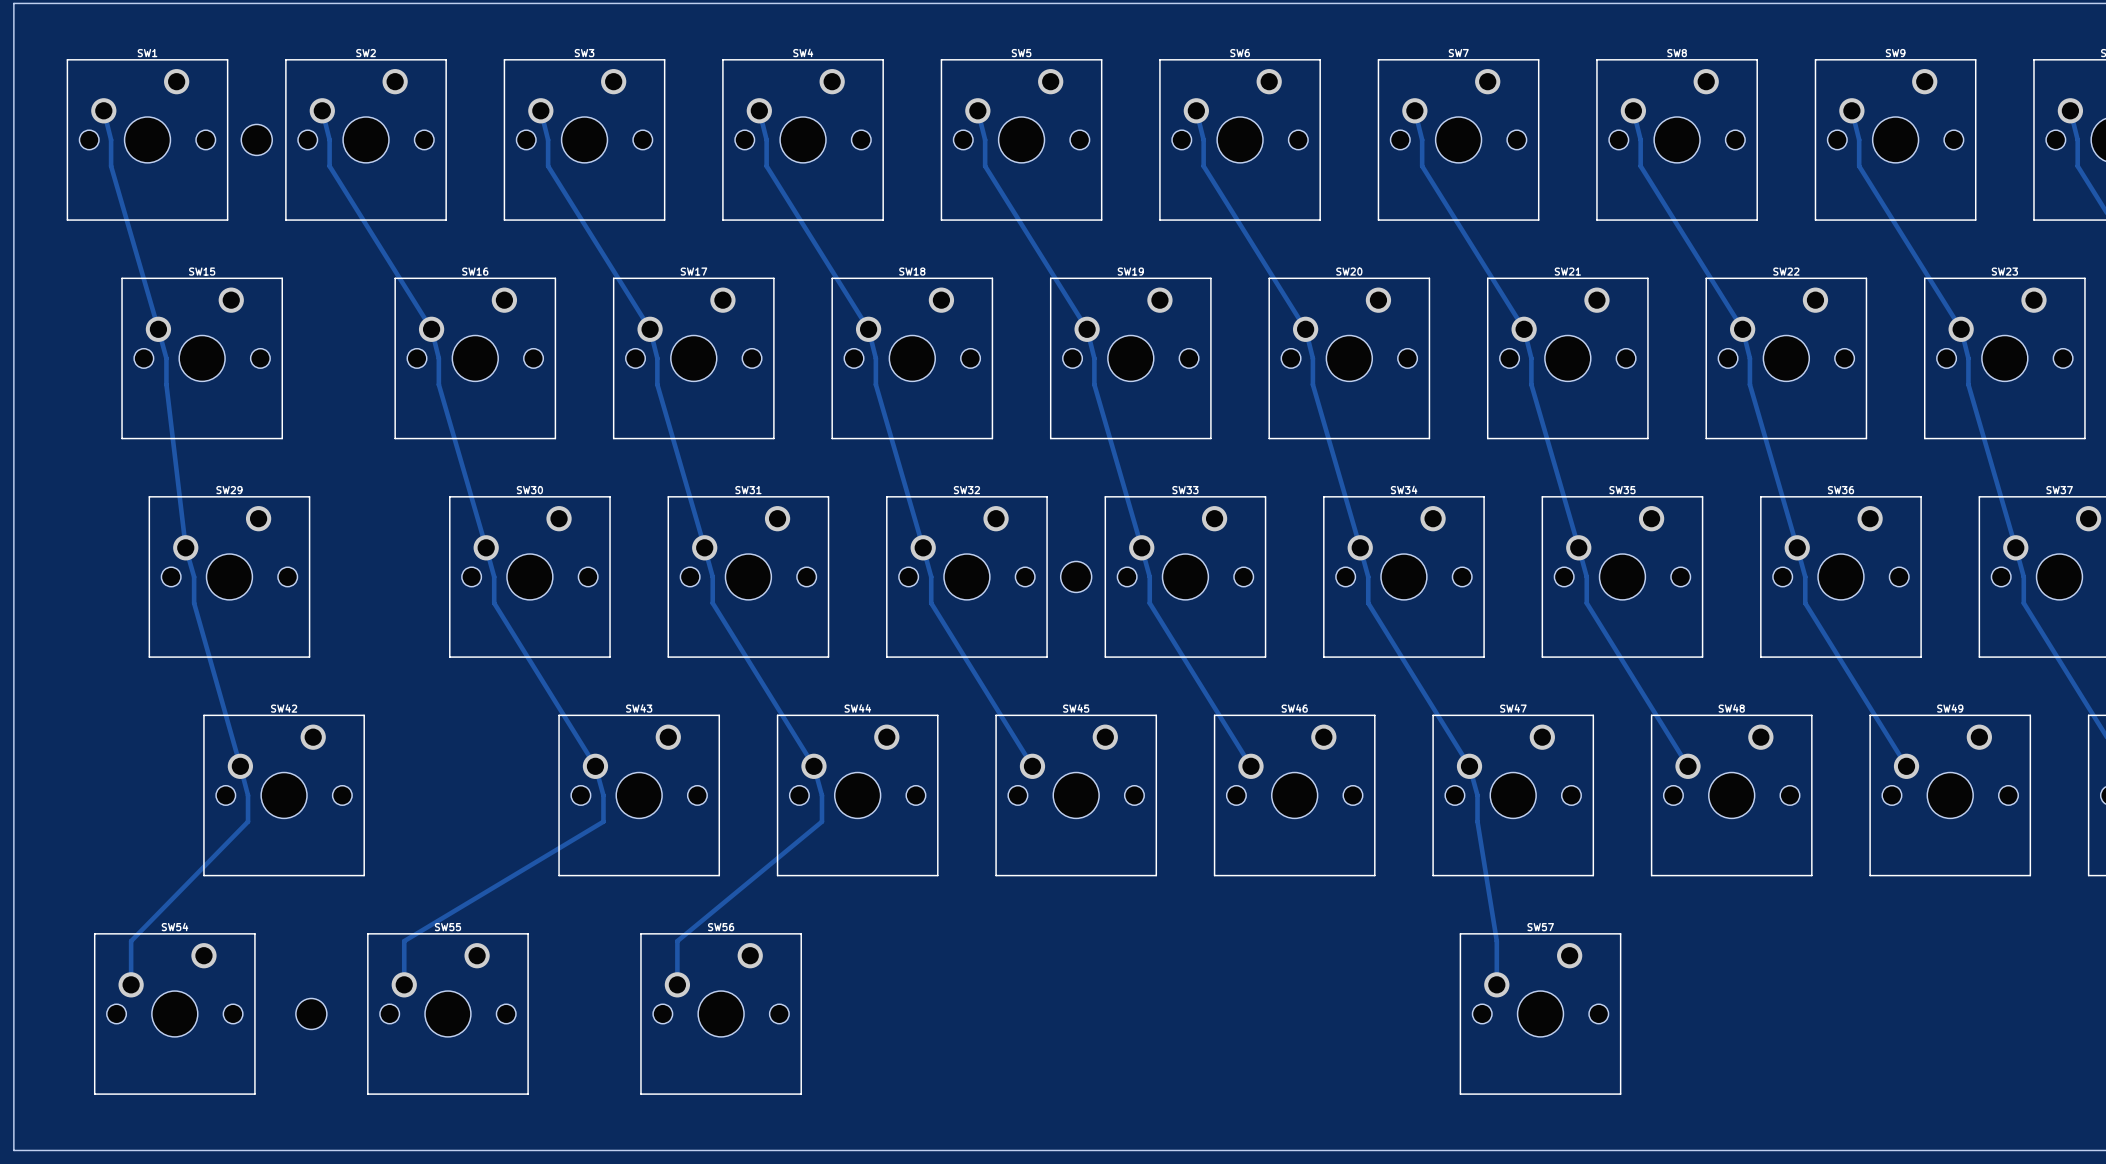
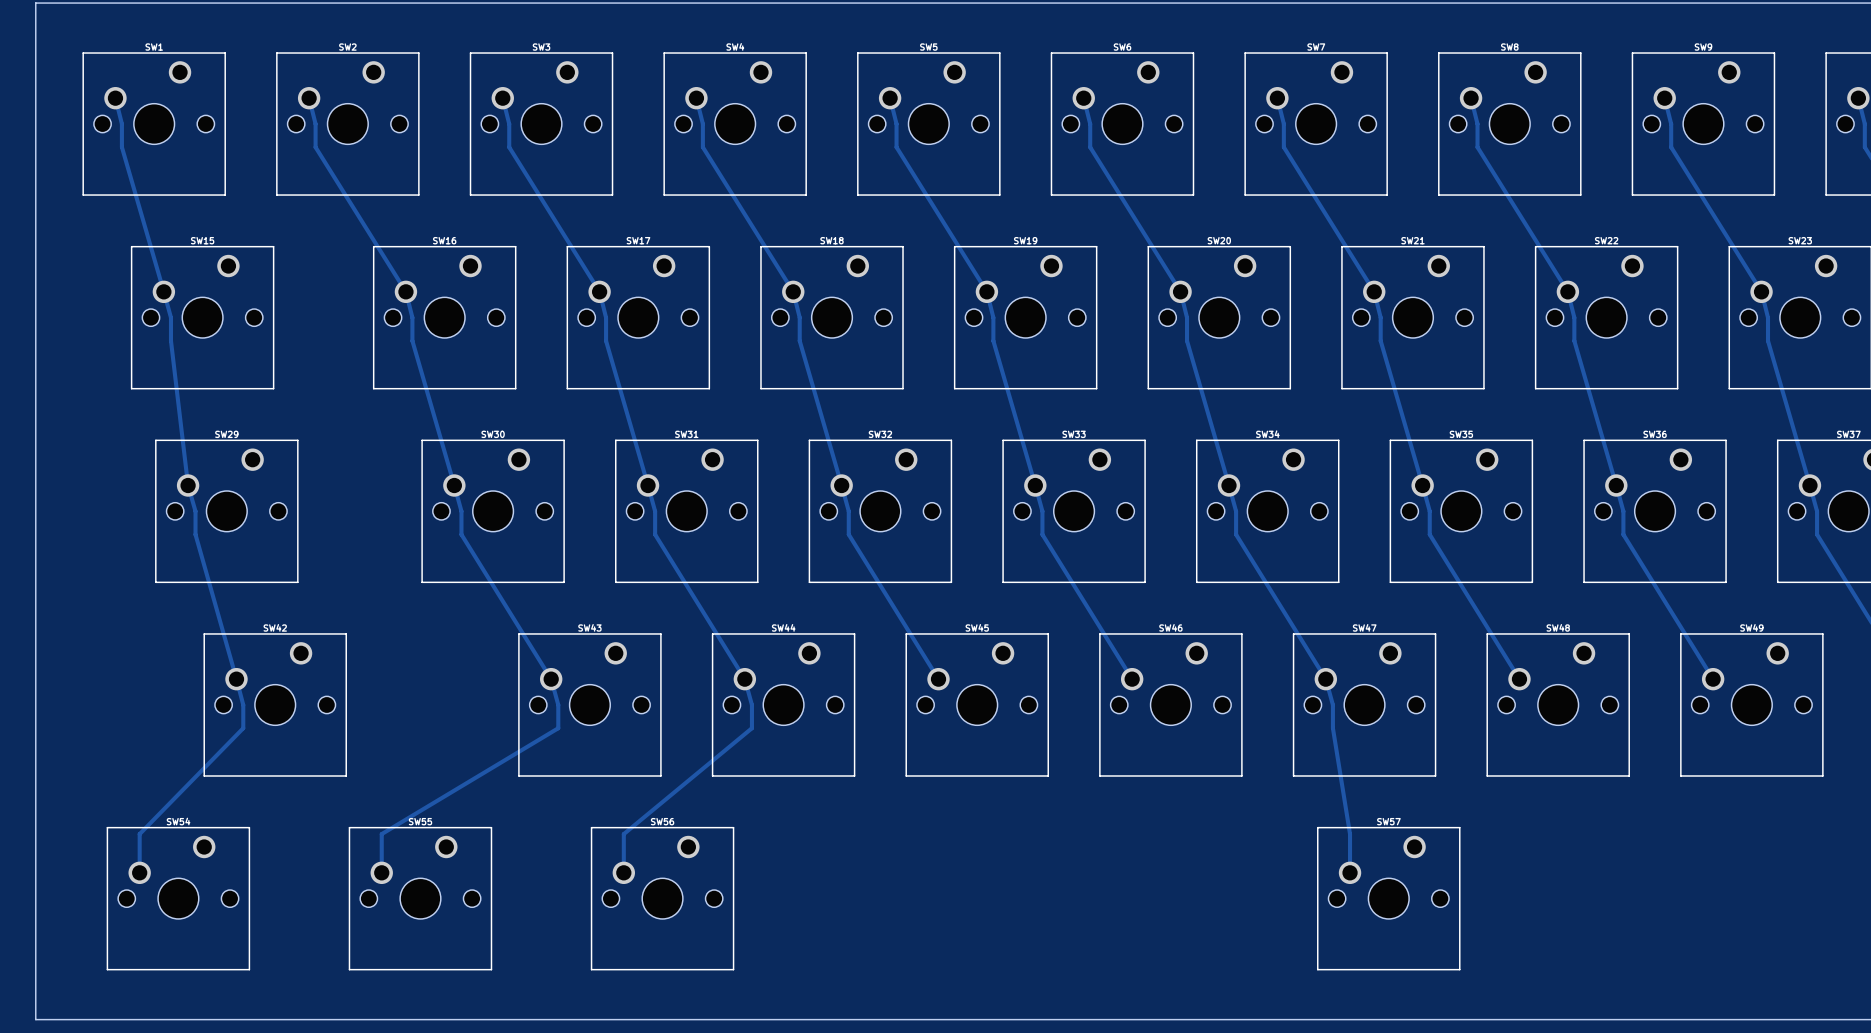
part: (256, 139) -> none
part: (1076, 576) -> none
part: (311, 1013) -> none

